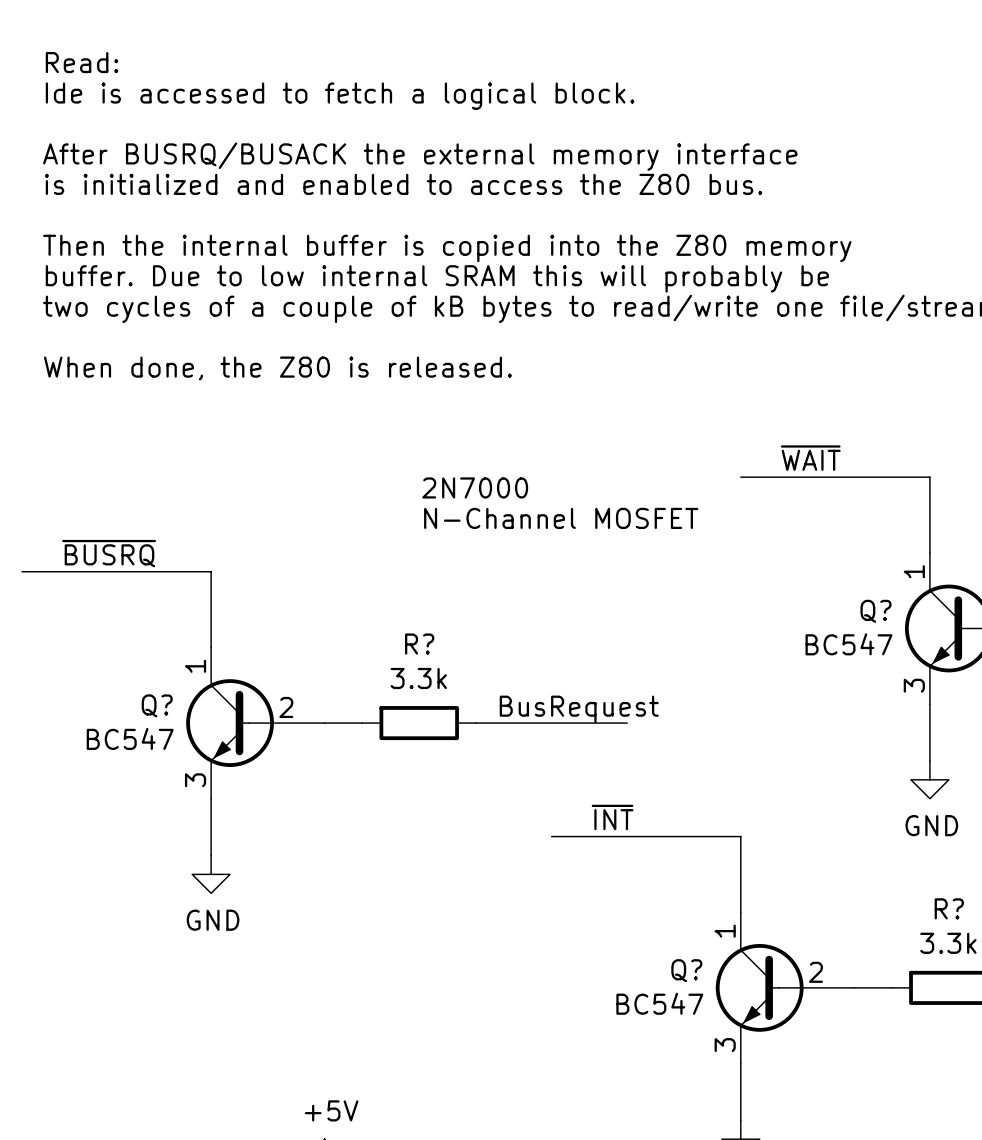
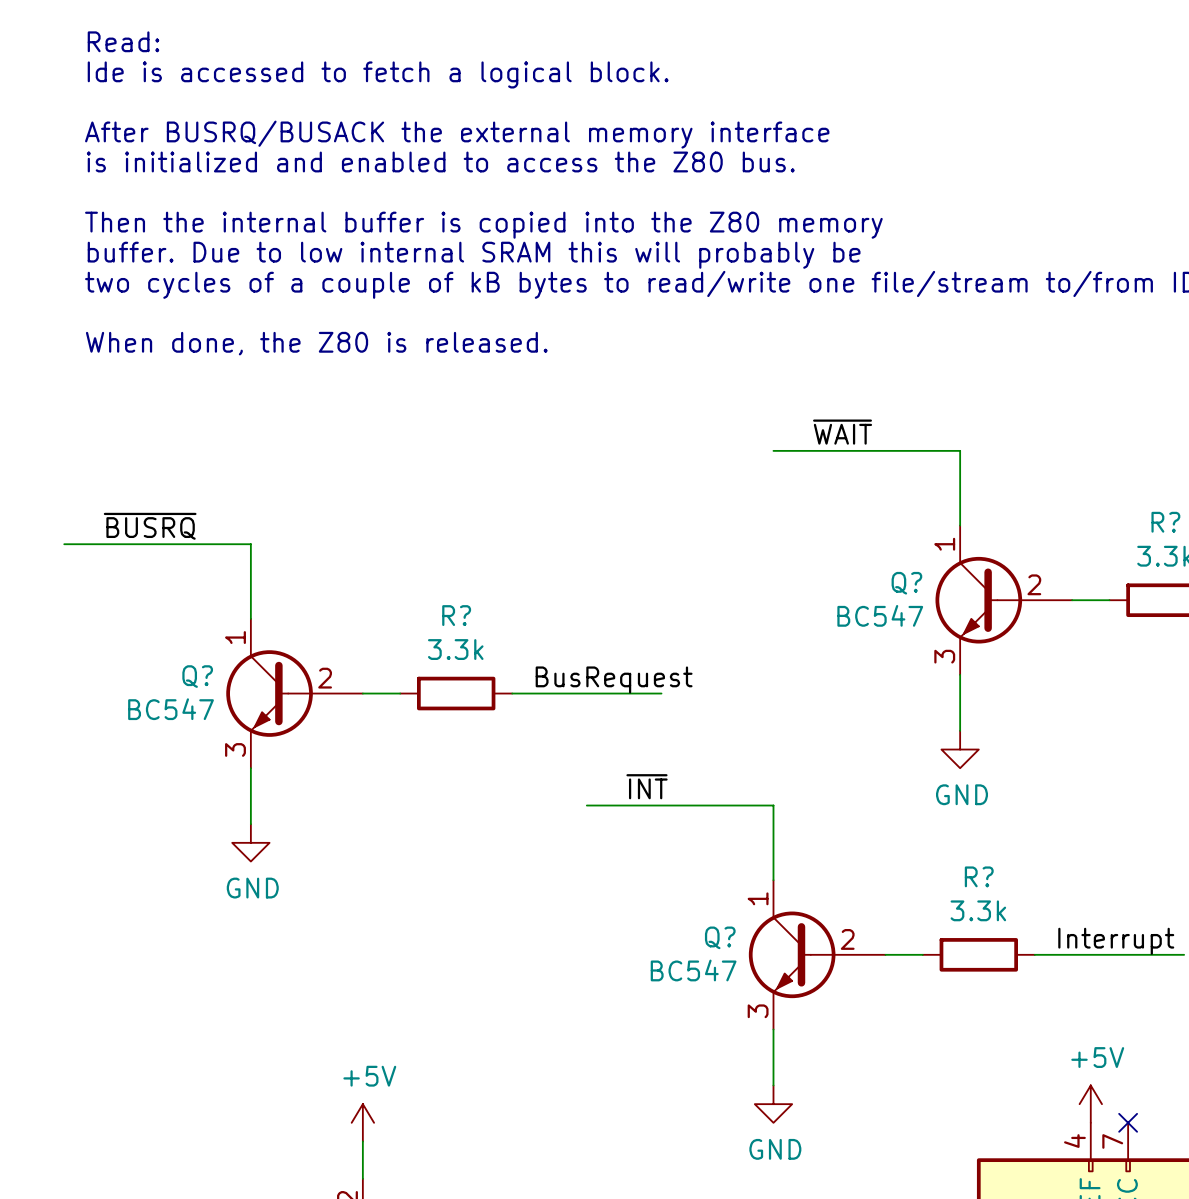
text: 2N7000 (475, 487) -> none
text: N-Channel MOSFET (561, 518) -> none

